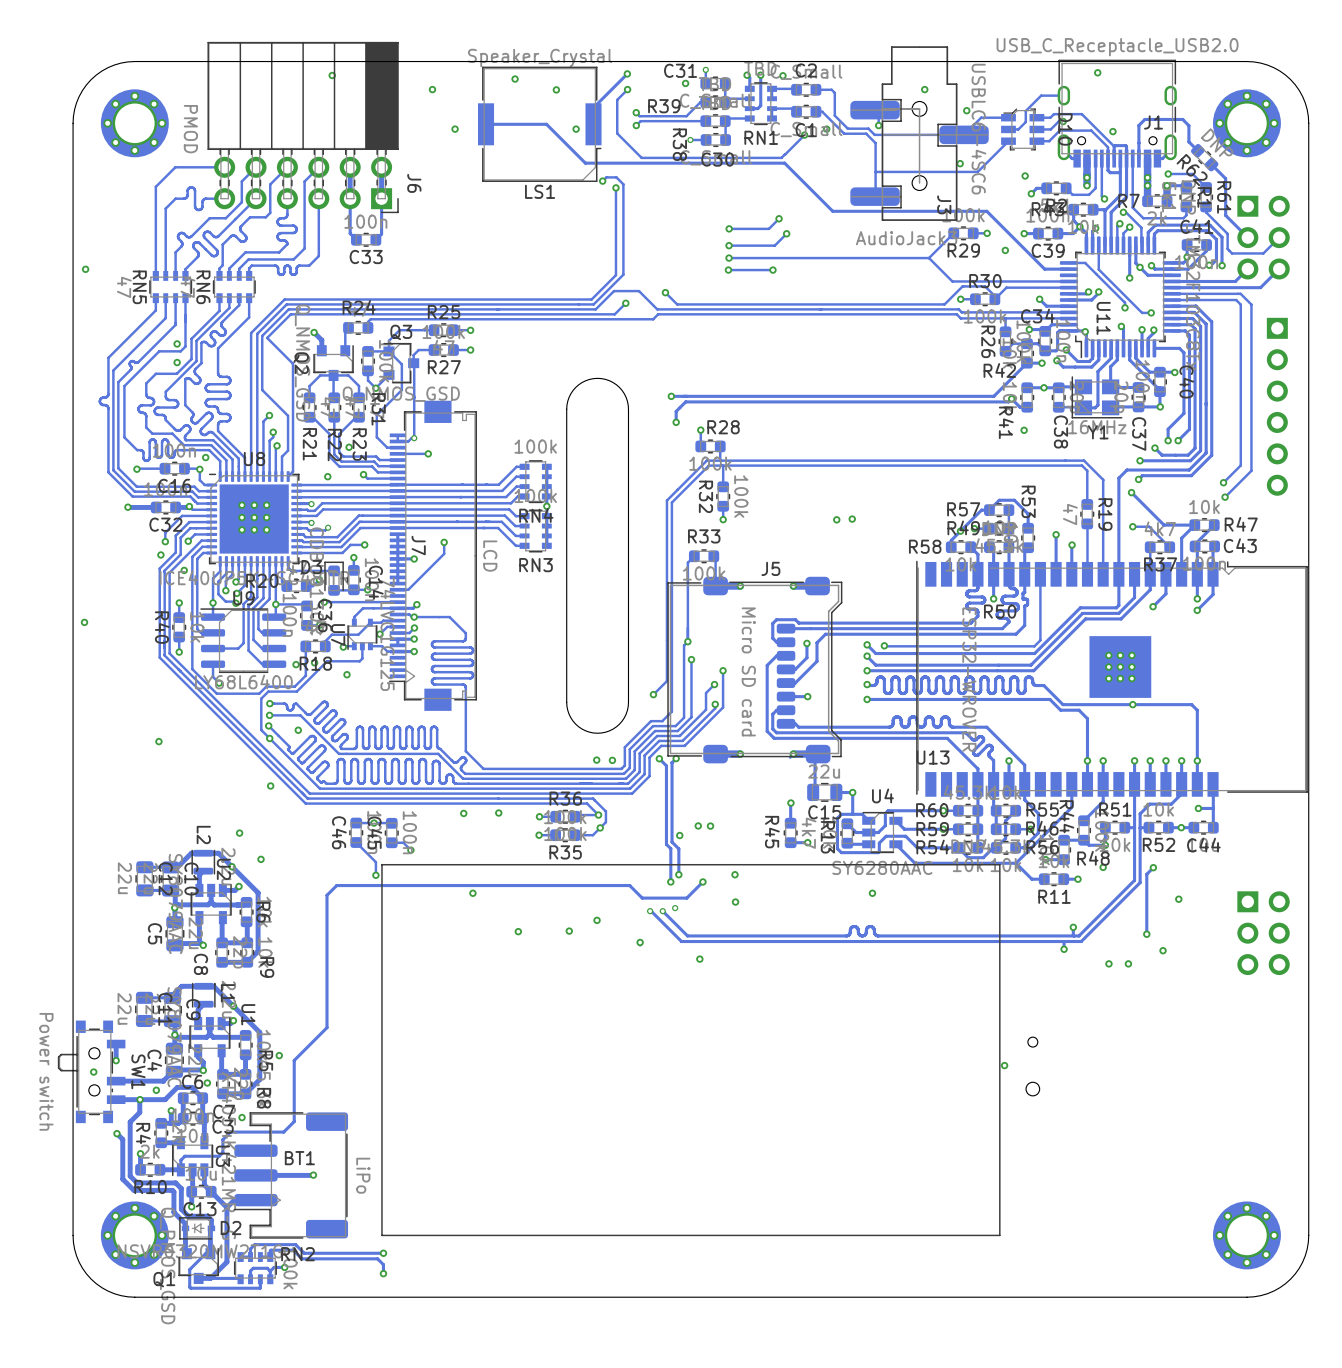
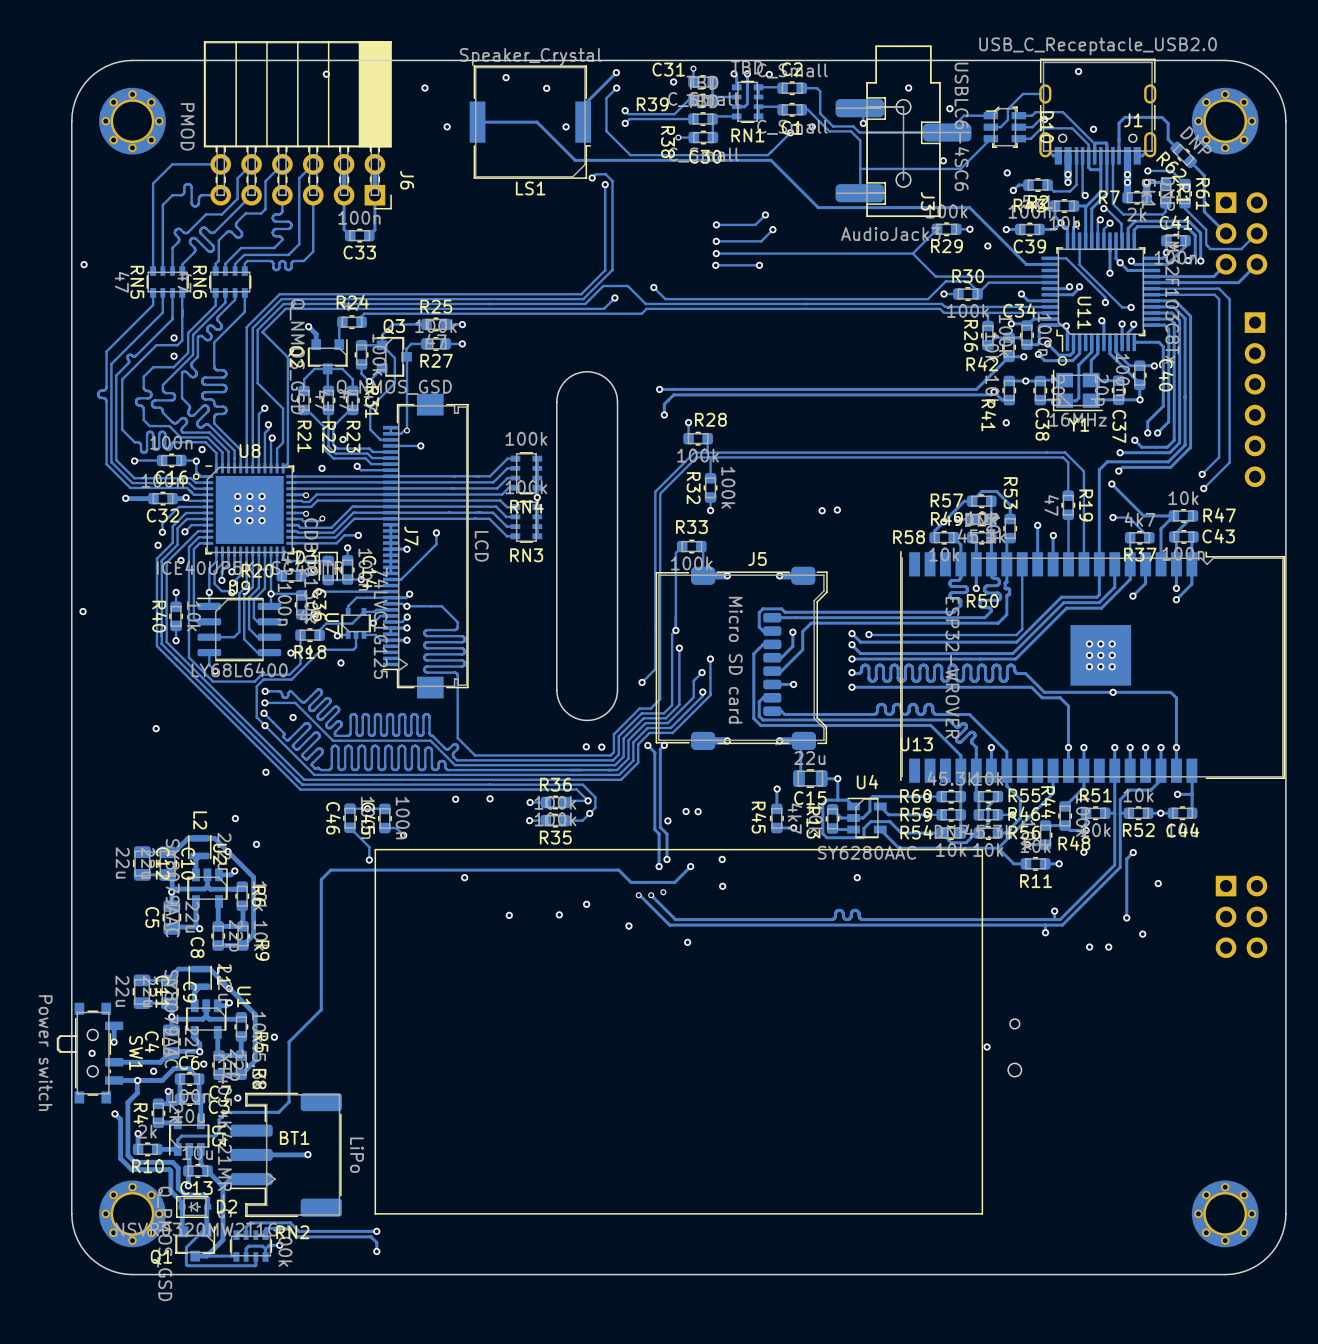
drawing: none -> [1057, 356, 1068, 366]
drawing: none -> [192, 473, 200, 481]

